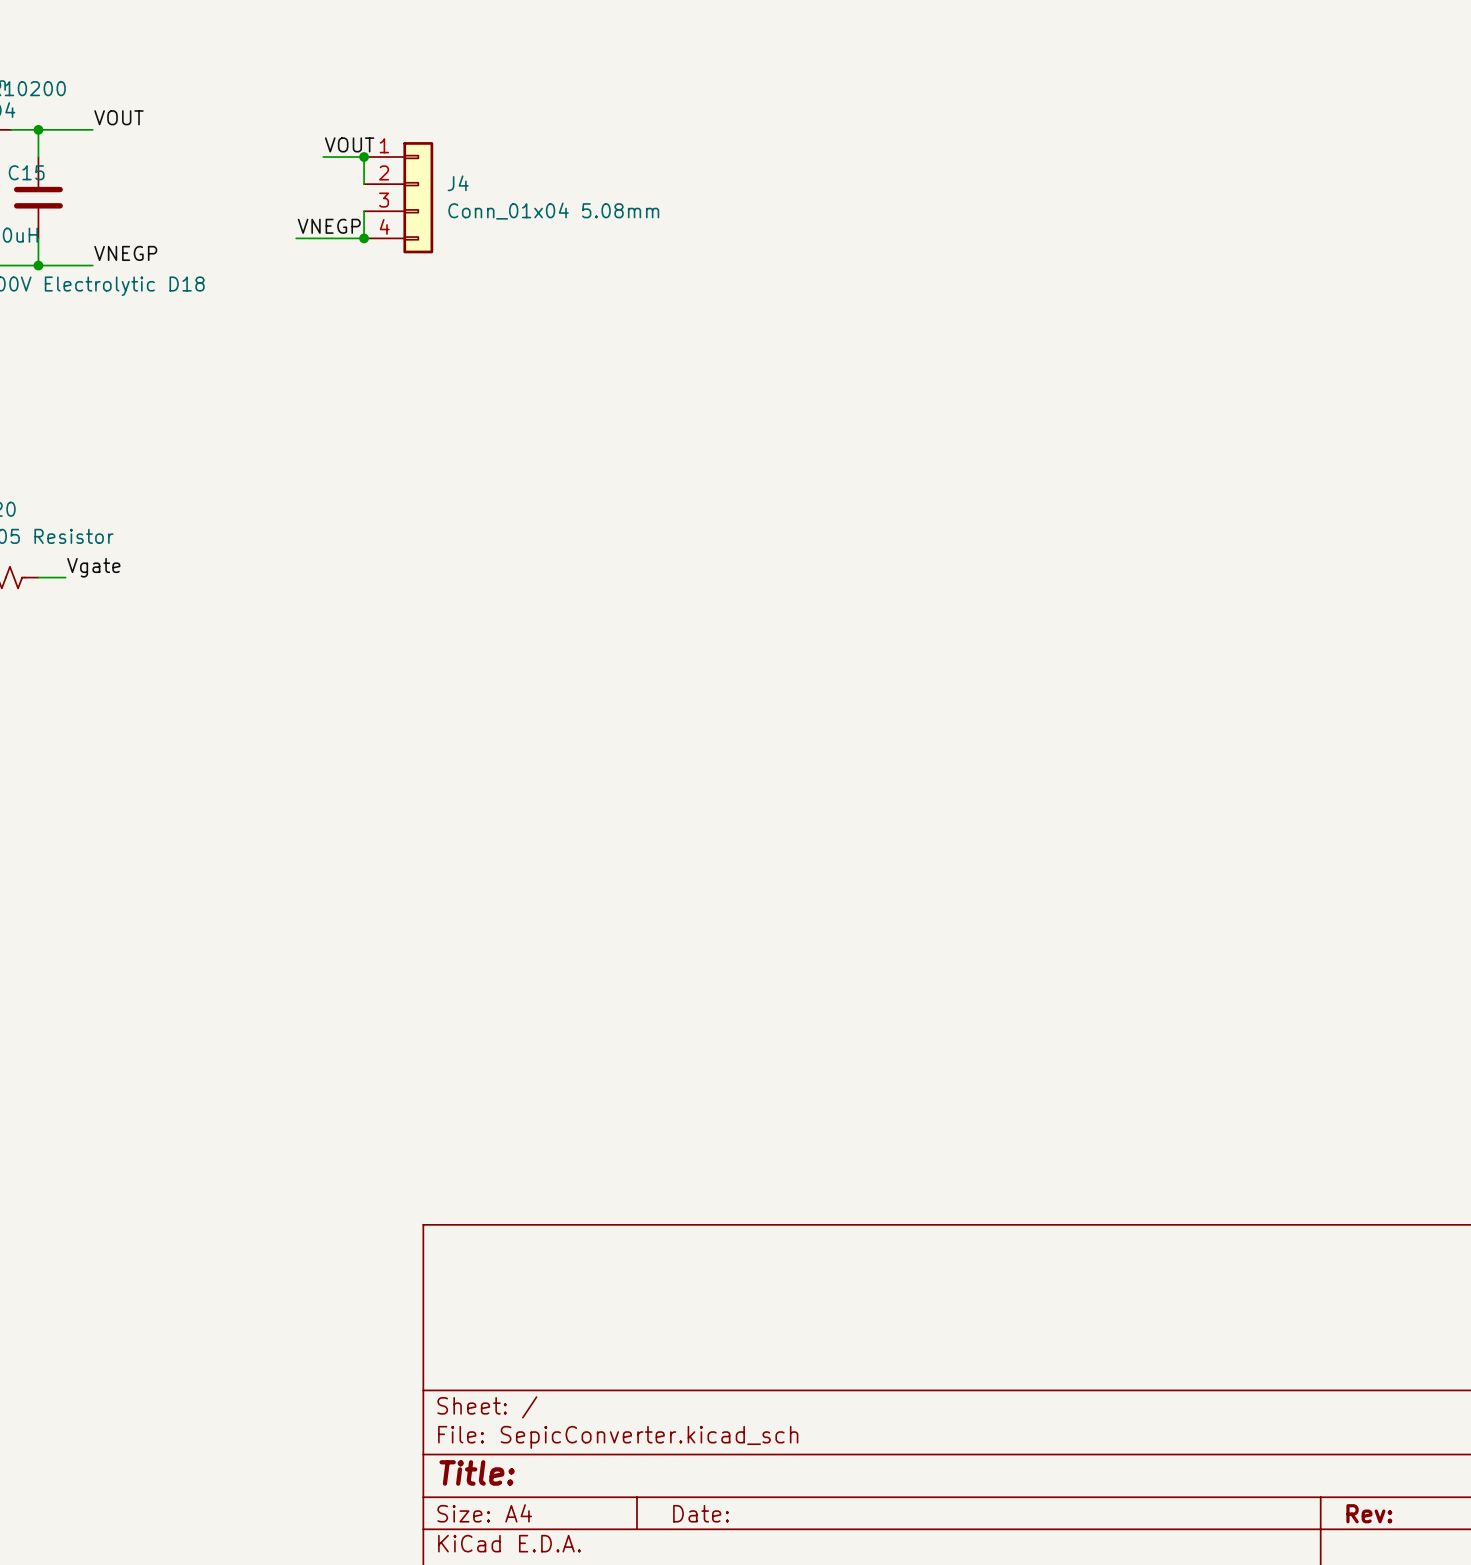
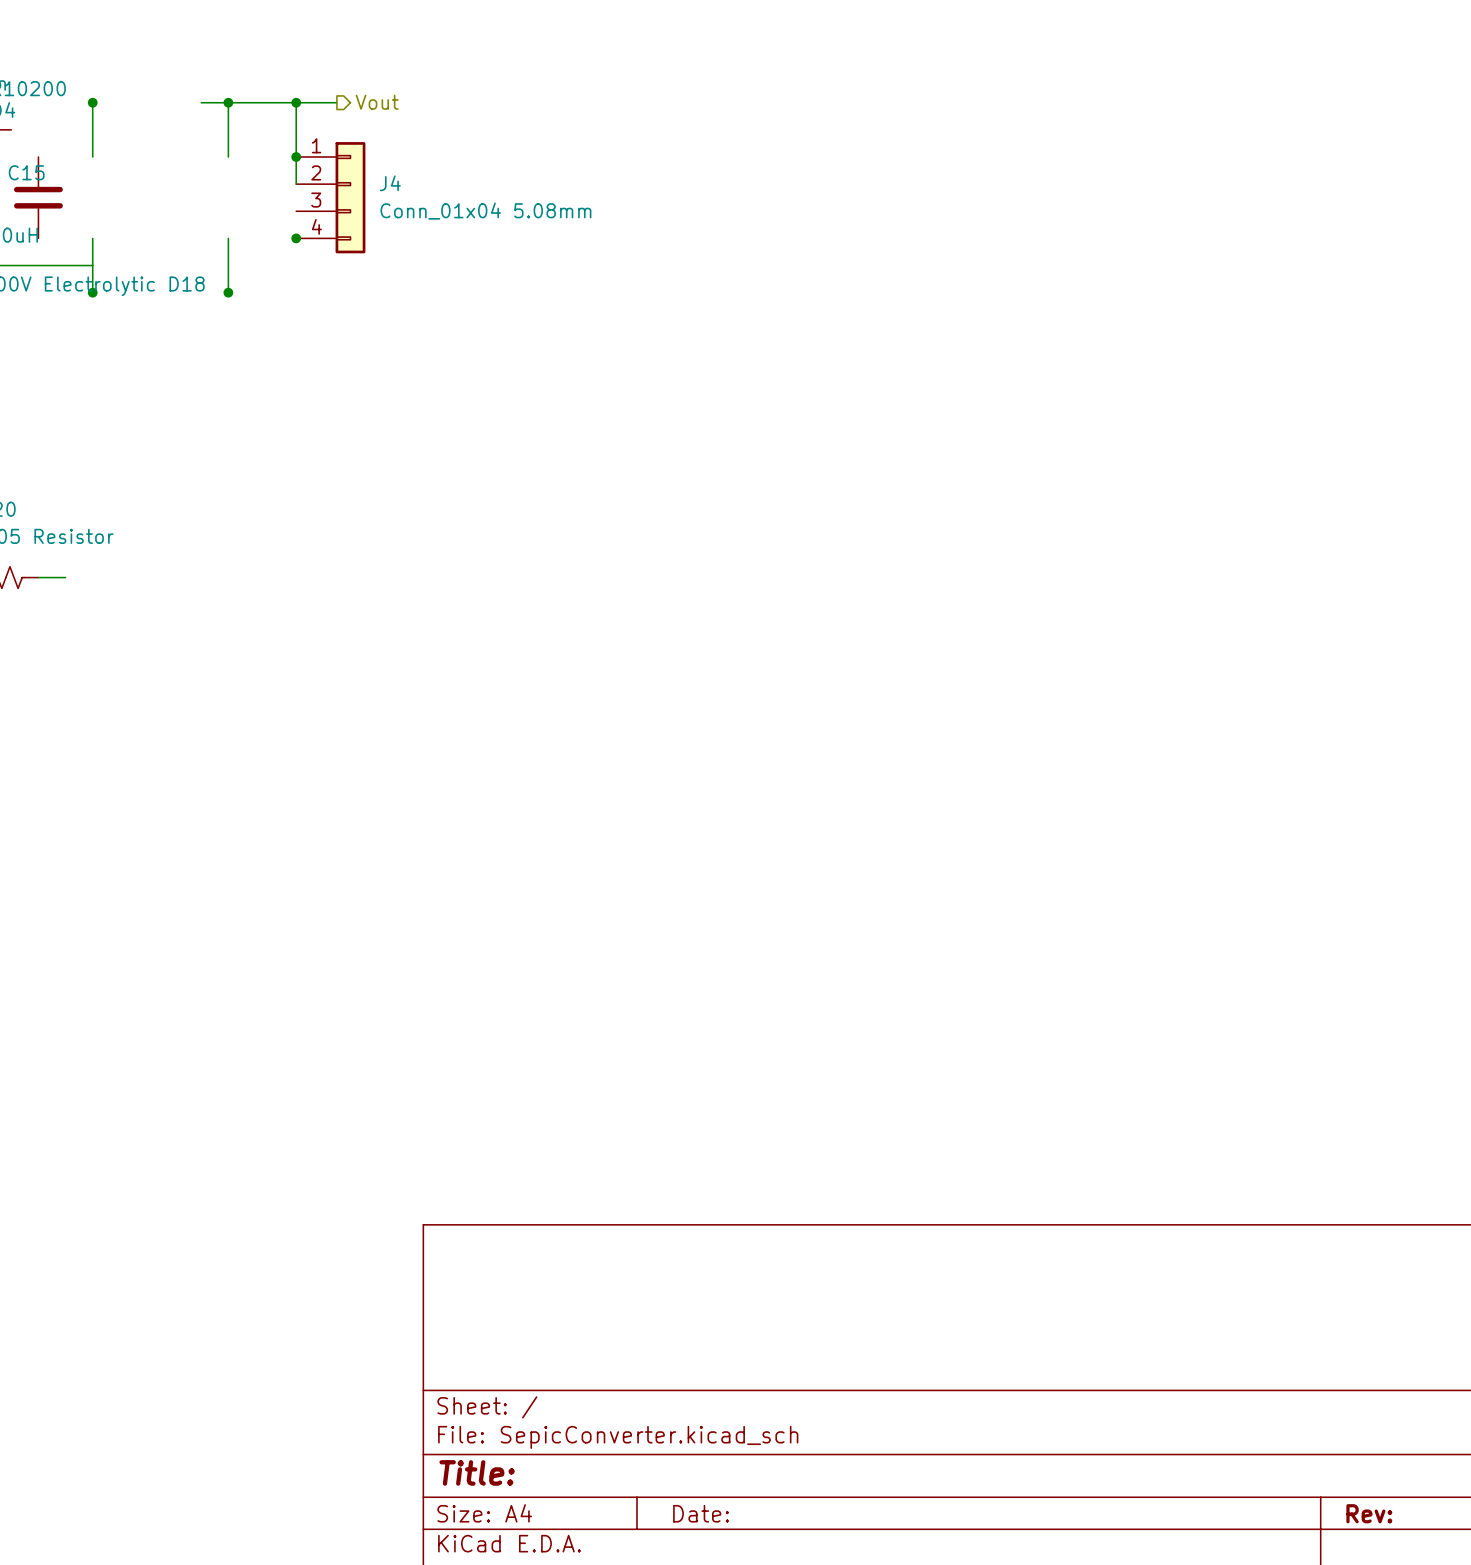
wire: none -> (92, 102) (92, 157)
junction: none -> (92, 102)
wire: none -> (201, 102) (336, 102)
wire: none -> (228, 102) (228, 157)
junction: none -> (228, 102)
wire: none -> (296, 102) (296, 184)
junction: none -> (296, 102)
hierarchical label: none -> Vout (377, 102)
label: VOUT (118, 117) -> none
wire: (11, 129) (92, 129) -> none
wire: (38, 129) (38, 157) -> none
junction: (38, 129) -> none
label: VOUT (349, 144) -> none
junction: none -> (296, 157)
junction: (364, 157) -> none
J4 position: (398, 197) -> (330, 197)
label: VNEGP (329, 226) -> none
wire: (38, 238) (38, 265) -> none
wire: none -> (92, 238) (92, 292)
wire: none -> (228, 238) (228, 292)
junction: none -> (296, 238)
junction: (364, 238) -> none
label: VNEGP (125, 253) -> none
junction: (38, 265) -> none
junction: none -> (92, 292)
junction: none -> (228, 292)
label: Vgate (93, 567) -> none

